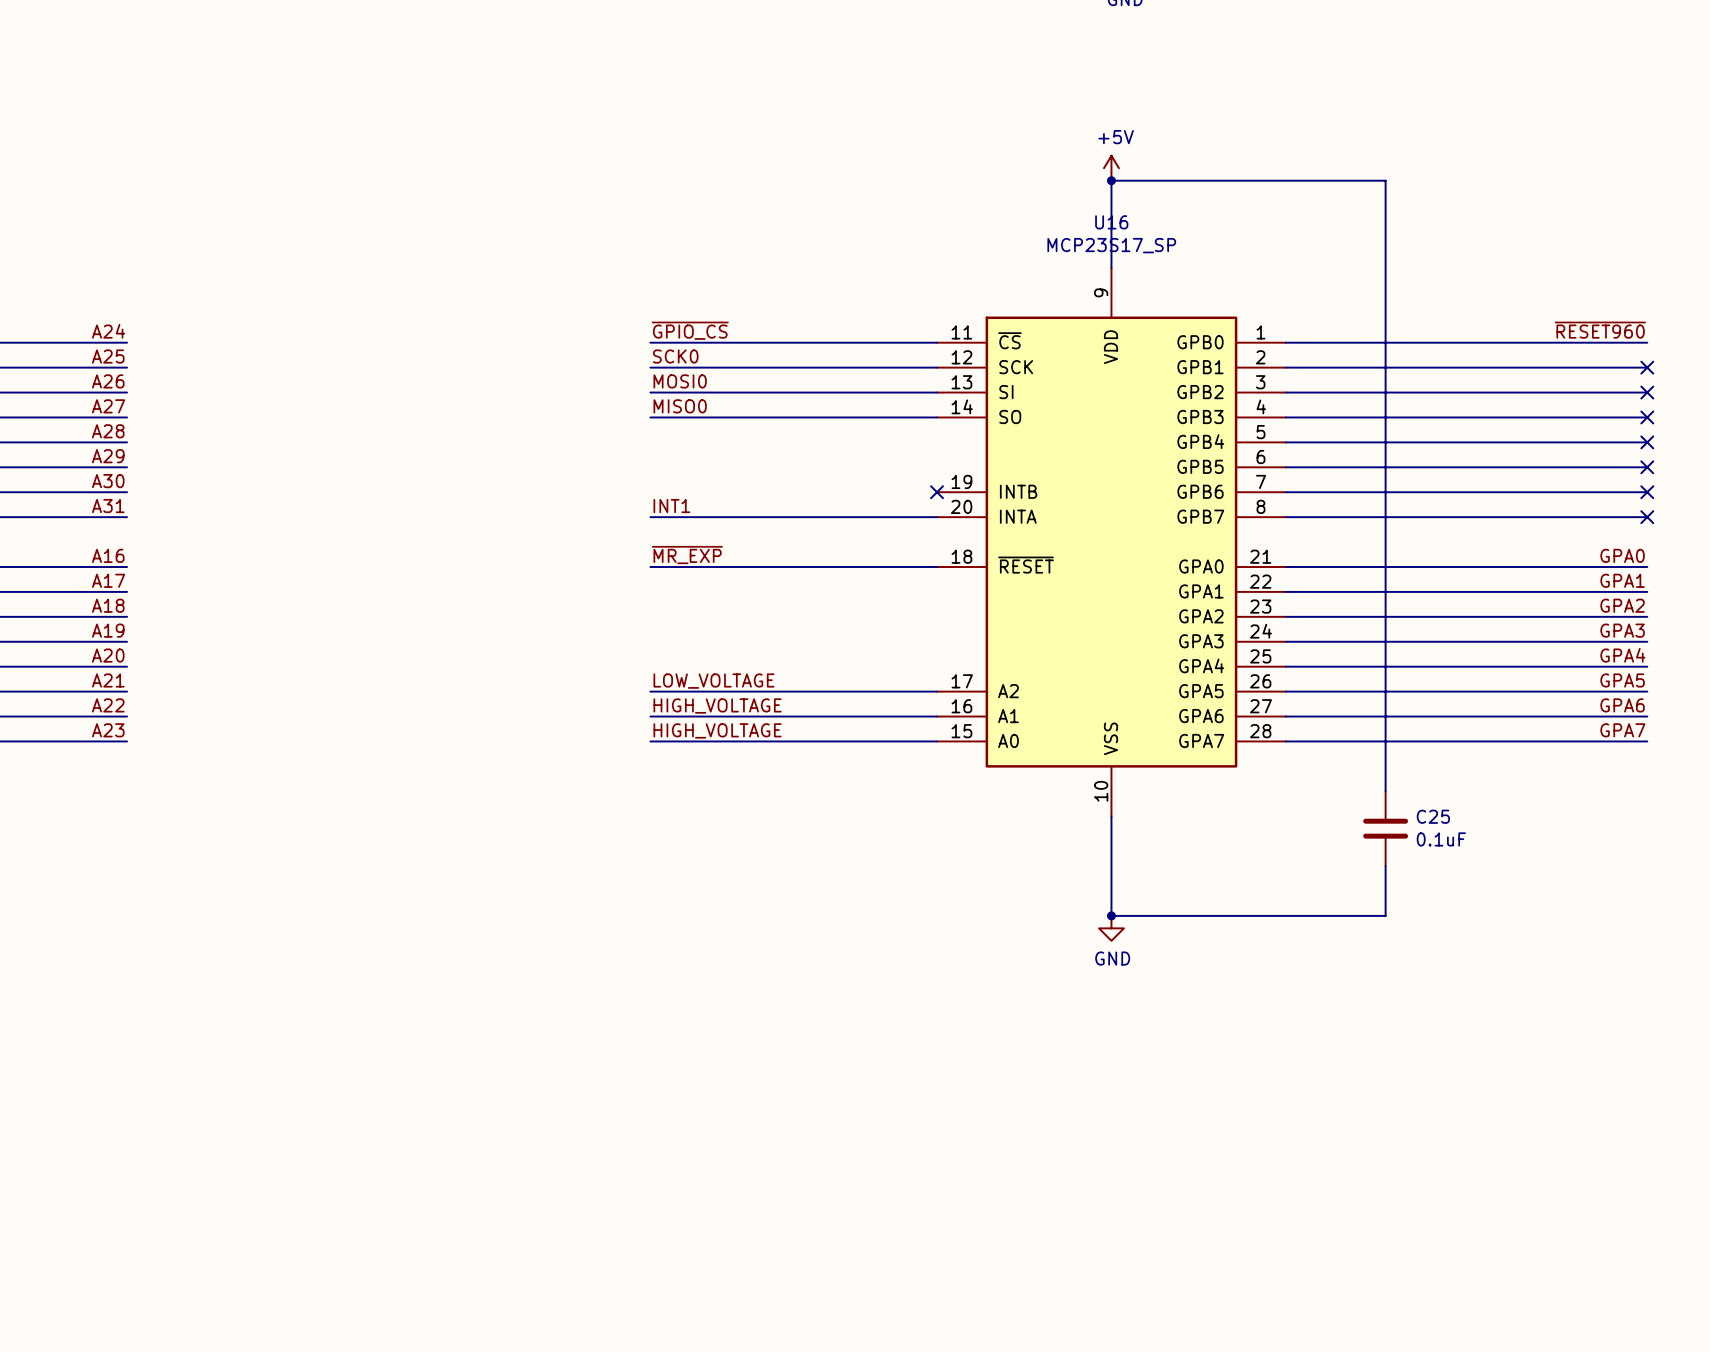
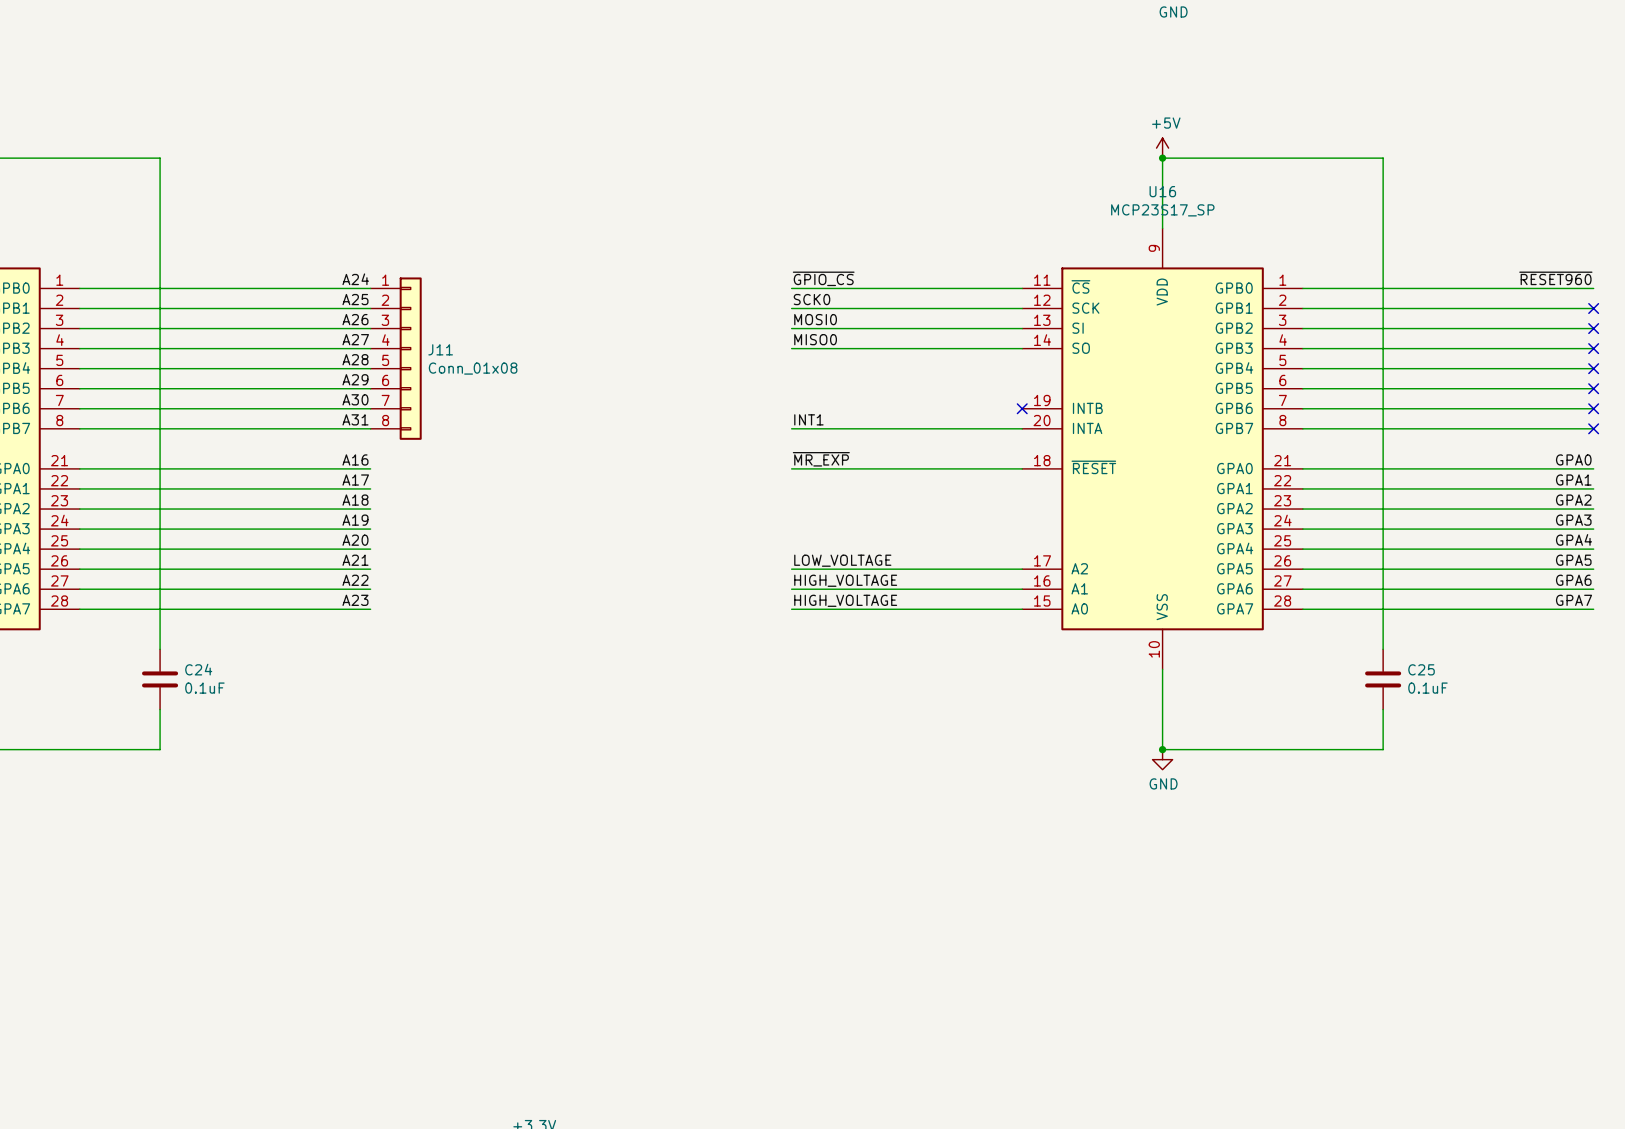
J11: none -> Conn_01x08 (396, 358)

